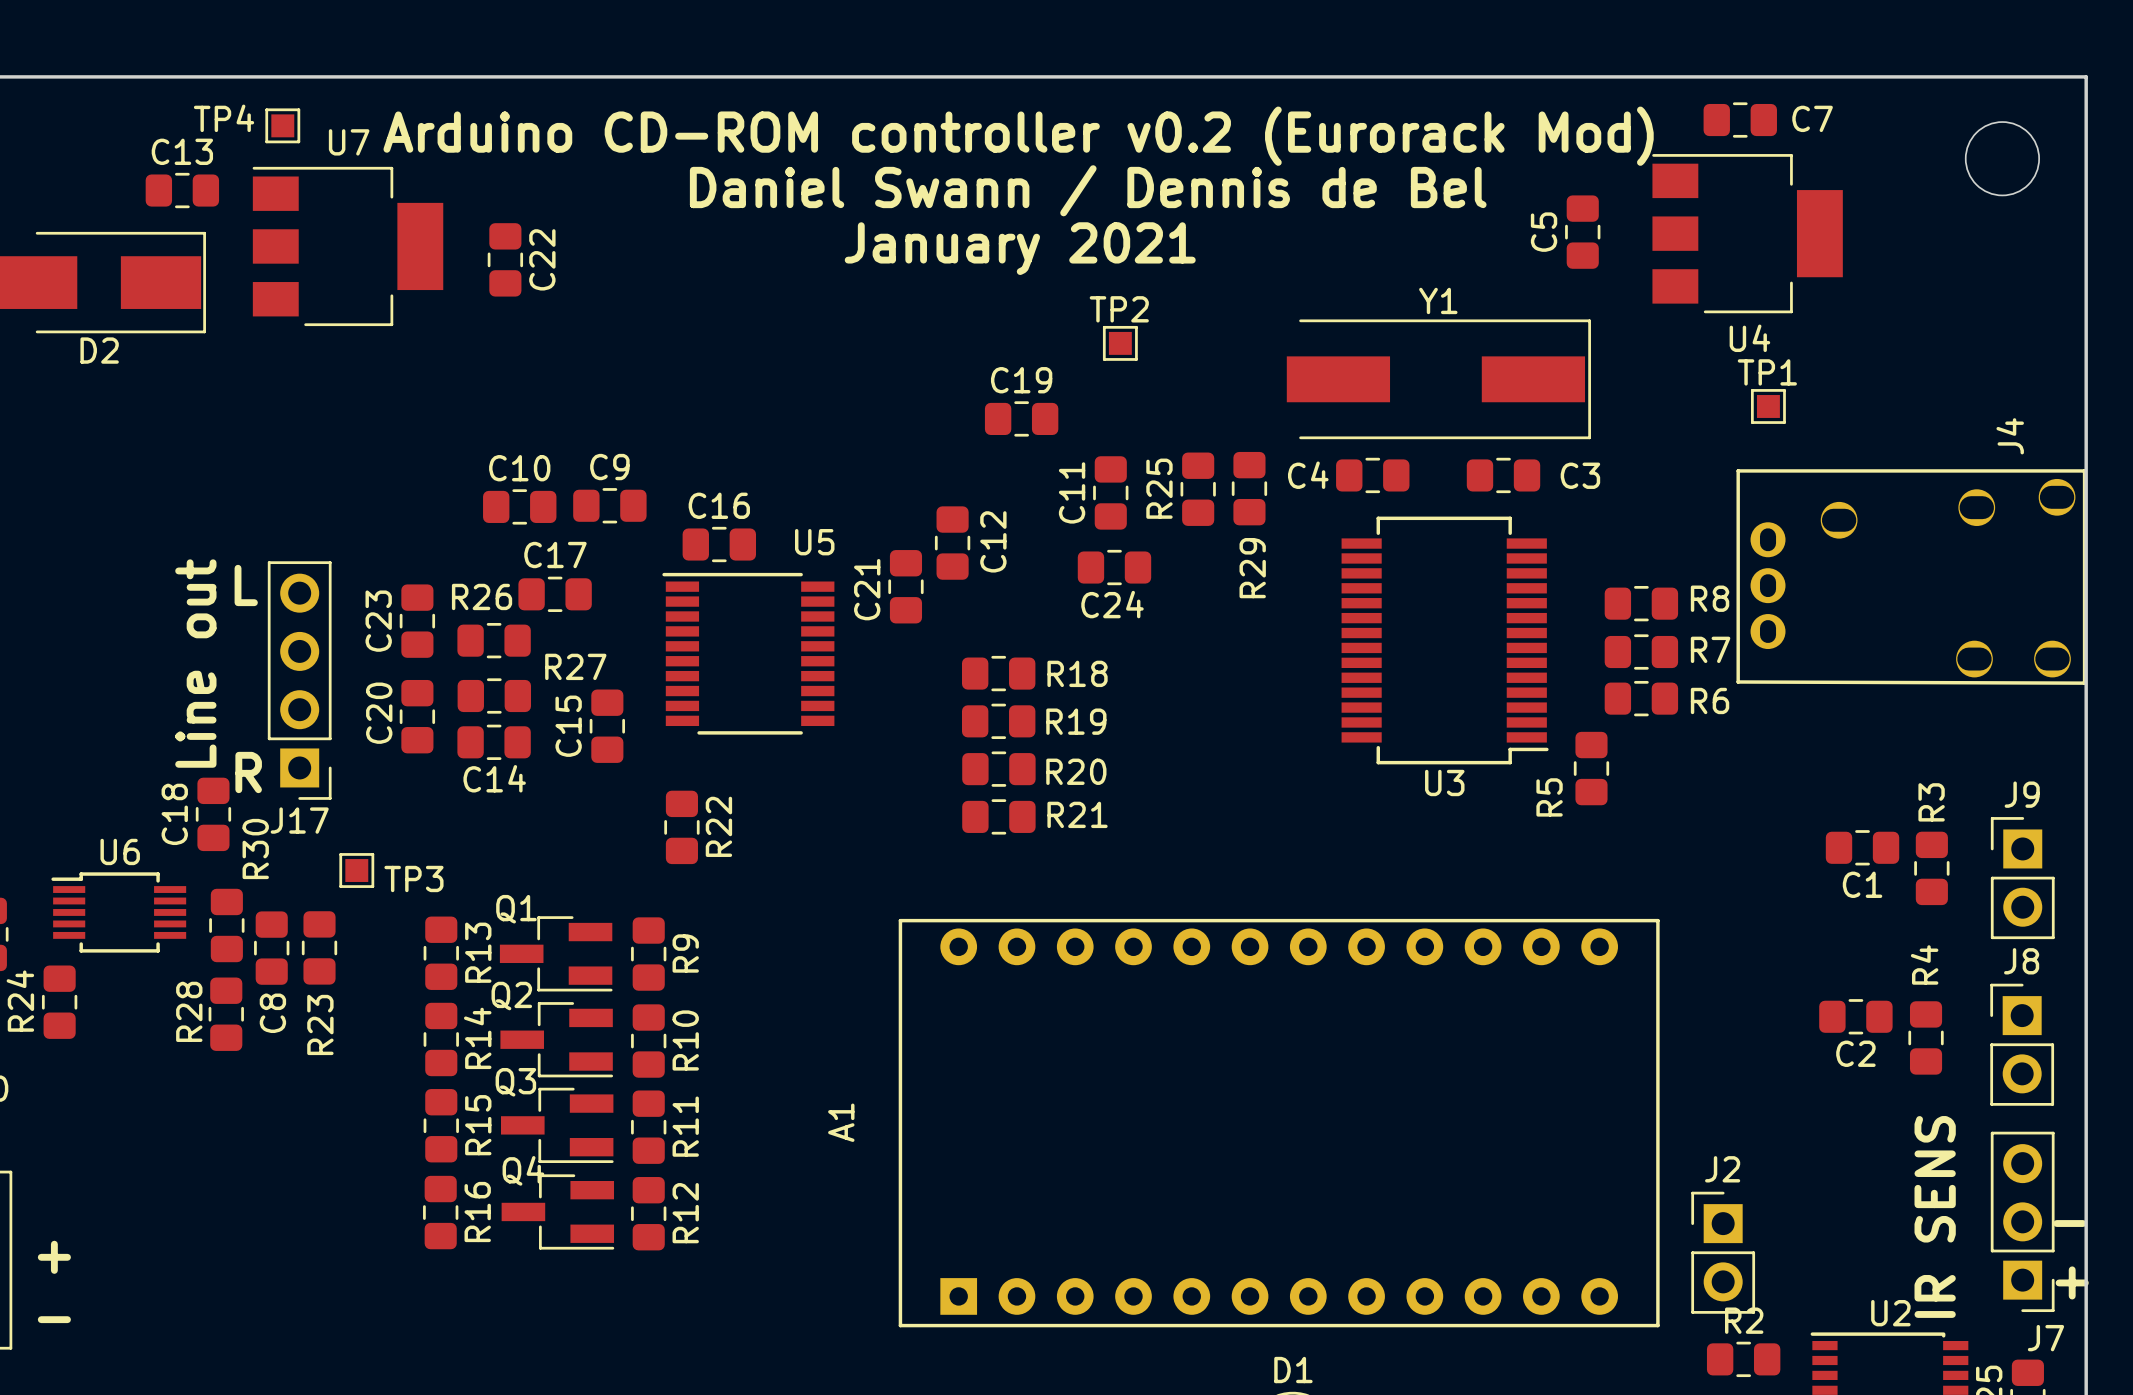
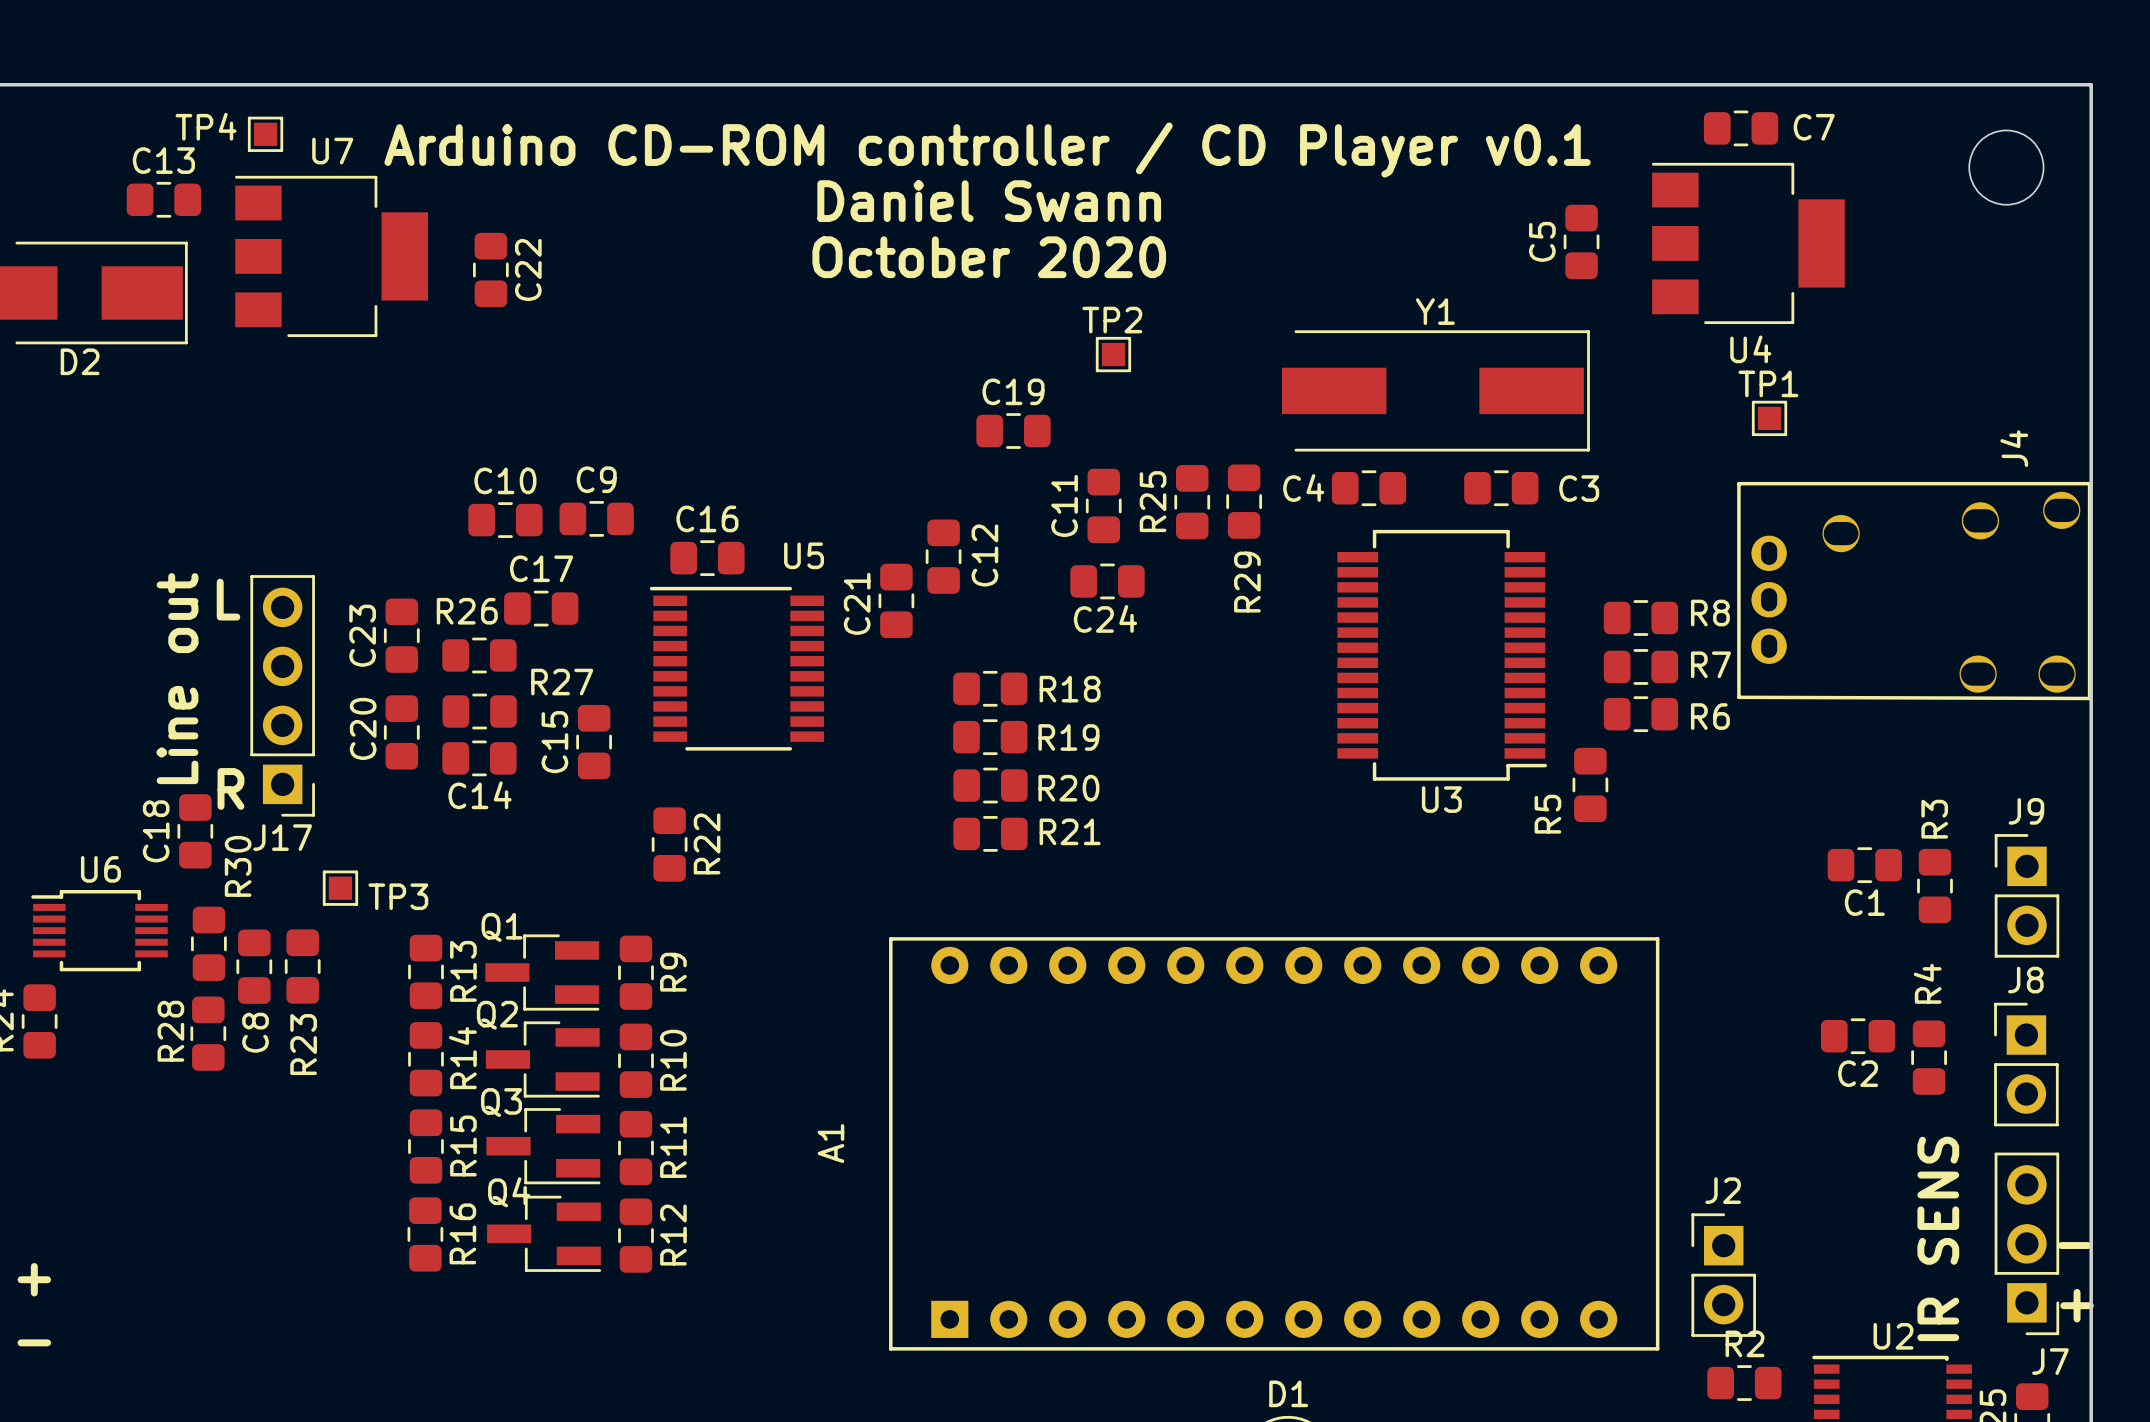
text: Arduino CD-ROM controller v0.2 (Eurorack Mod) (1018, 136) -> Arduino CD-ROM controller / CD Player v0.1 (987, 150)
text: Daniel Swann / Dennis de Bel (1088, 190) -> none
text: none -> Daniel Swann (989, 201)
text: none -> October 2020 (989, 257)
text: January 2021 (1020, 248) -> none

